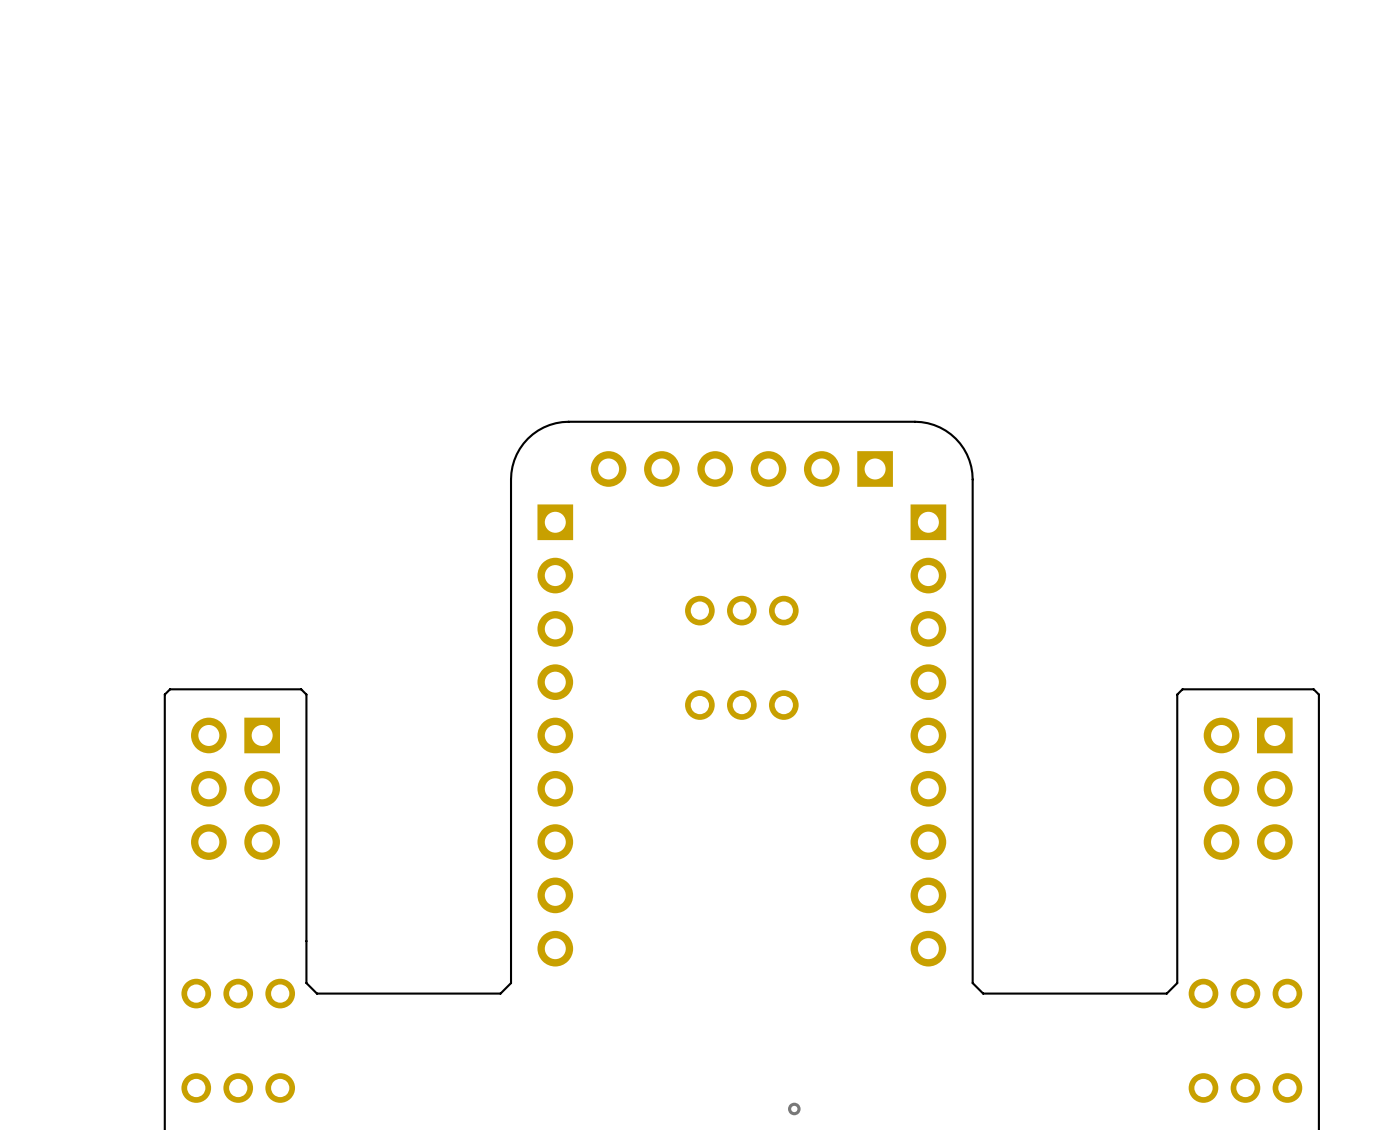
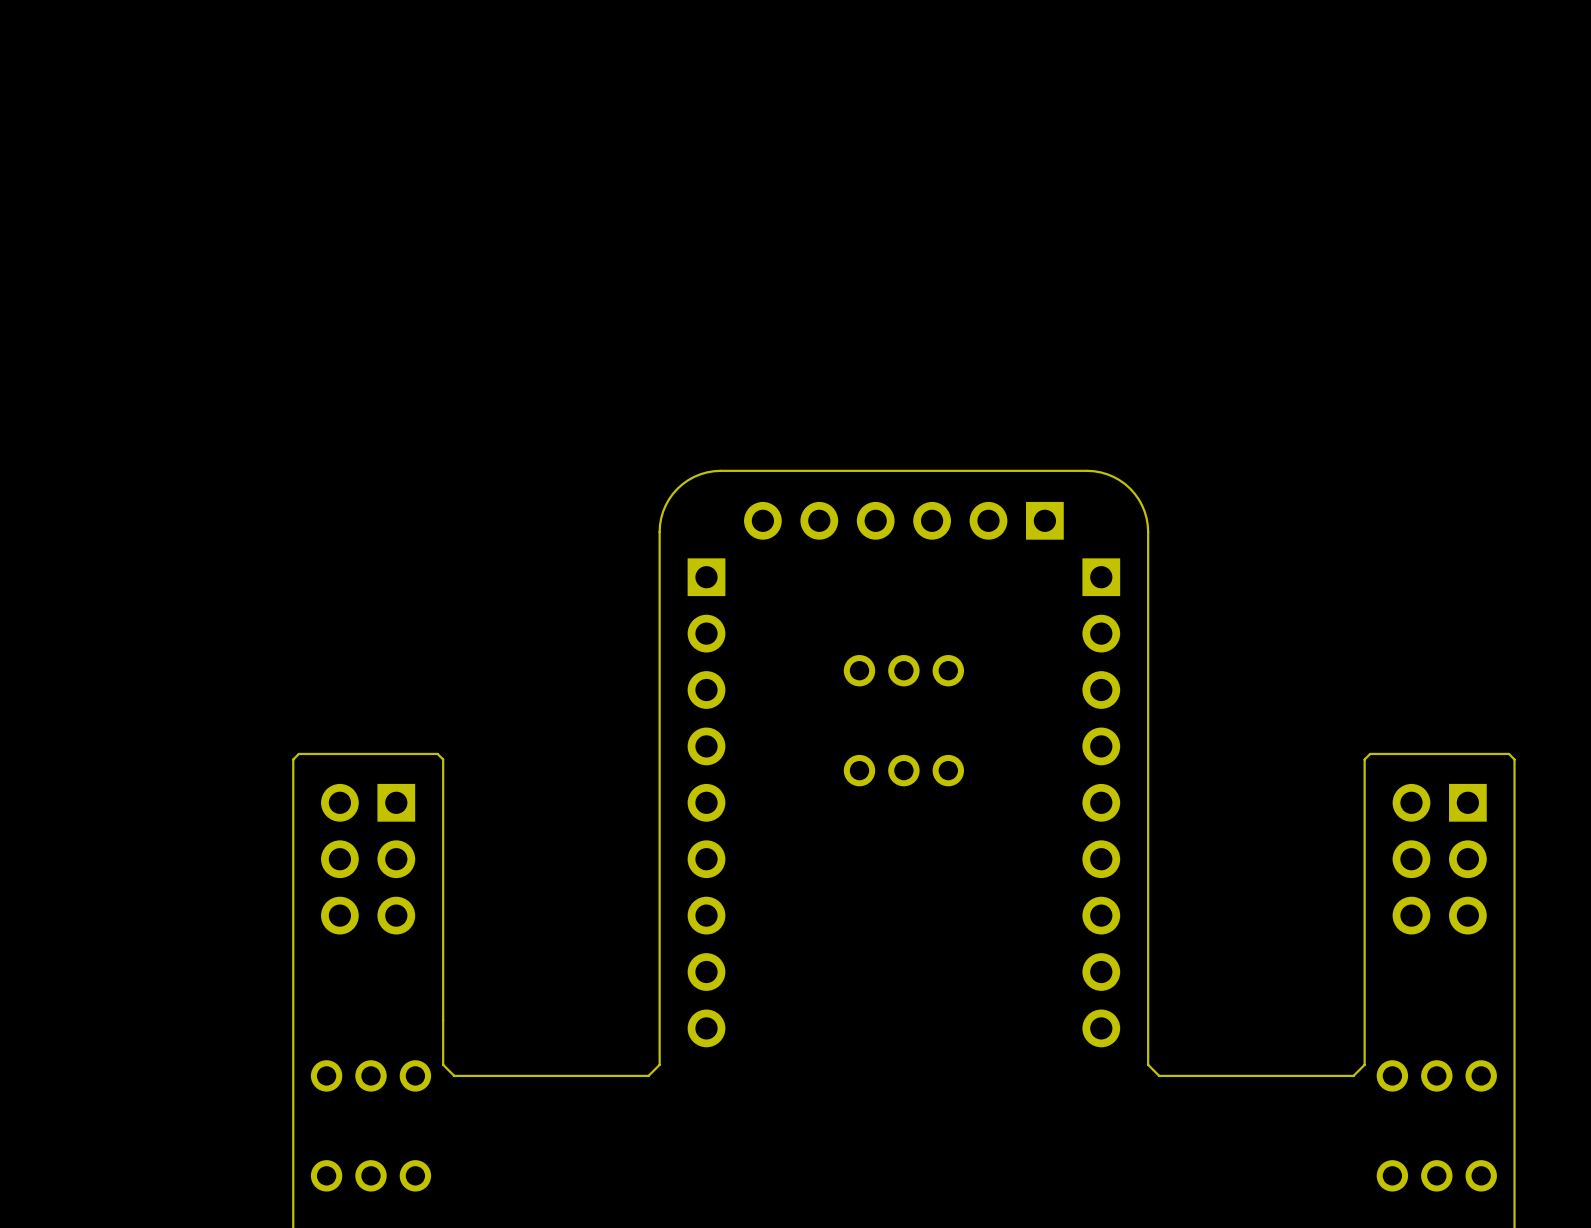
via: (794, 1108) -> none

